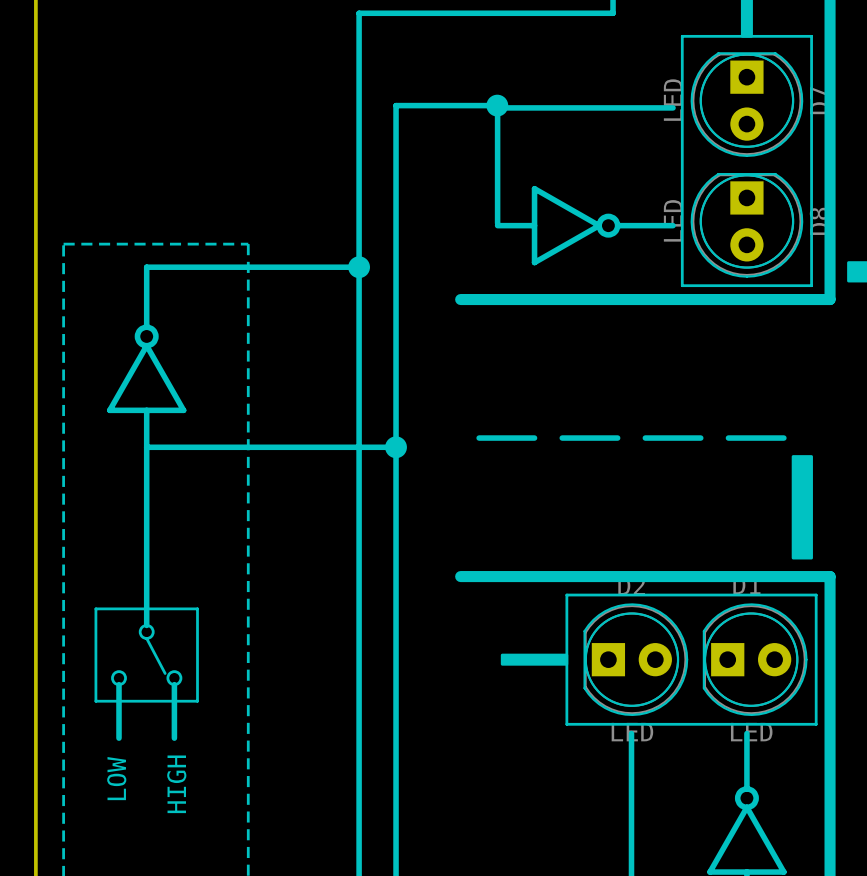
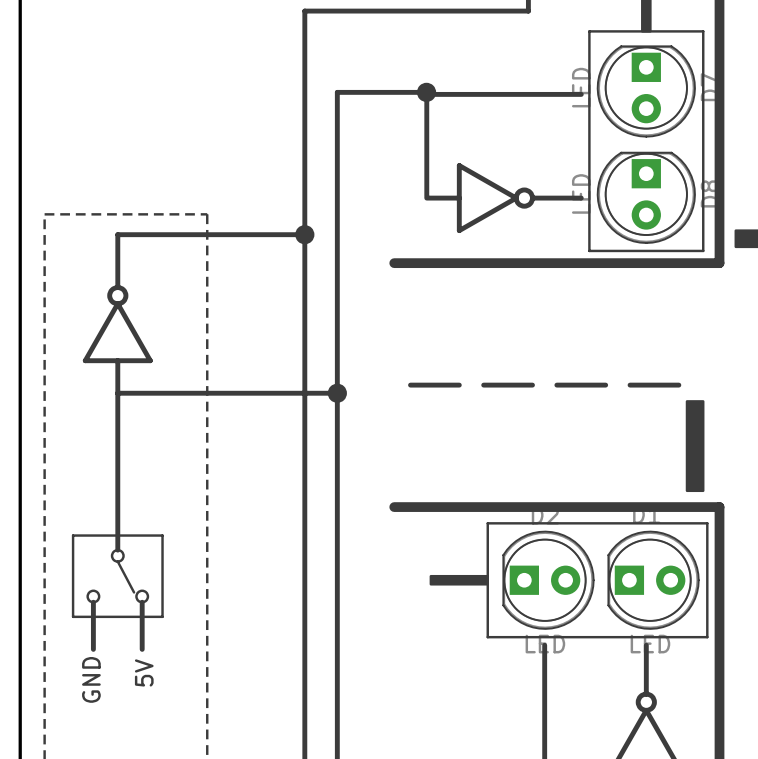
text: none -> 5V (144, 672)
text: LOW (116, 778) -> GND (91, 679)
text: HIGH (176, 784) -> none

